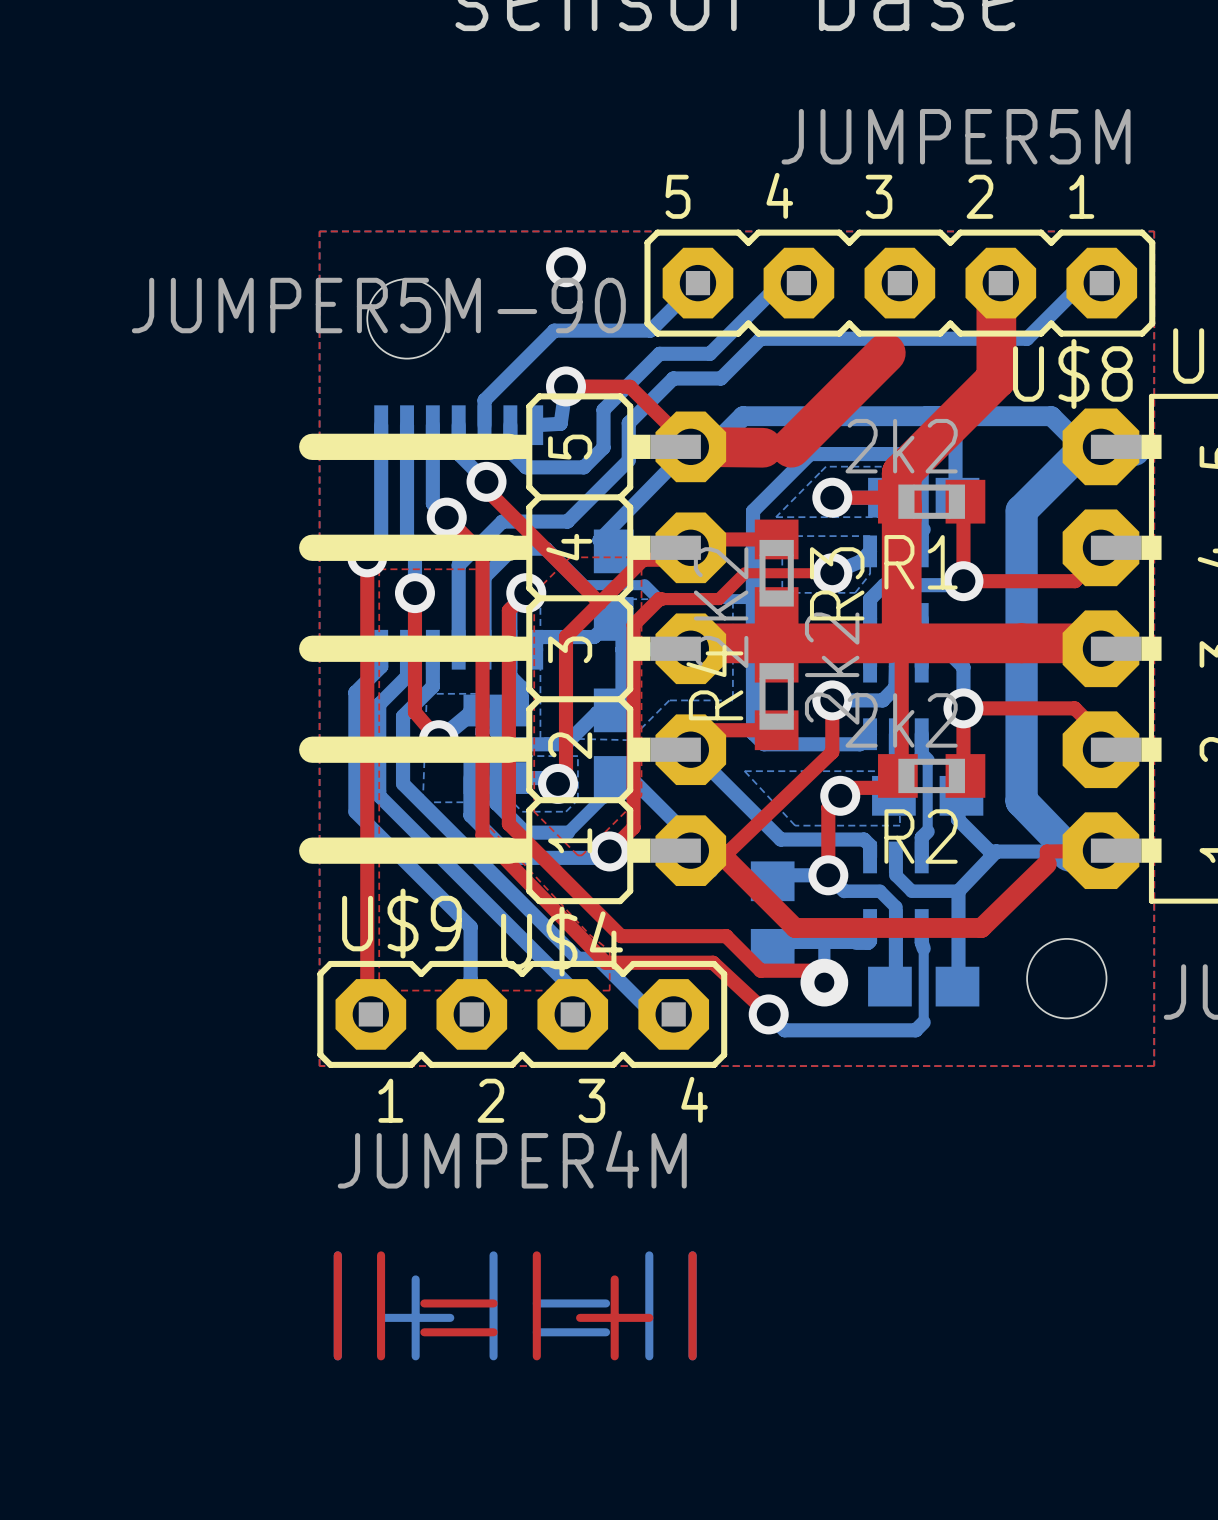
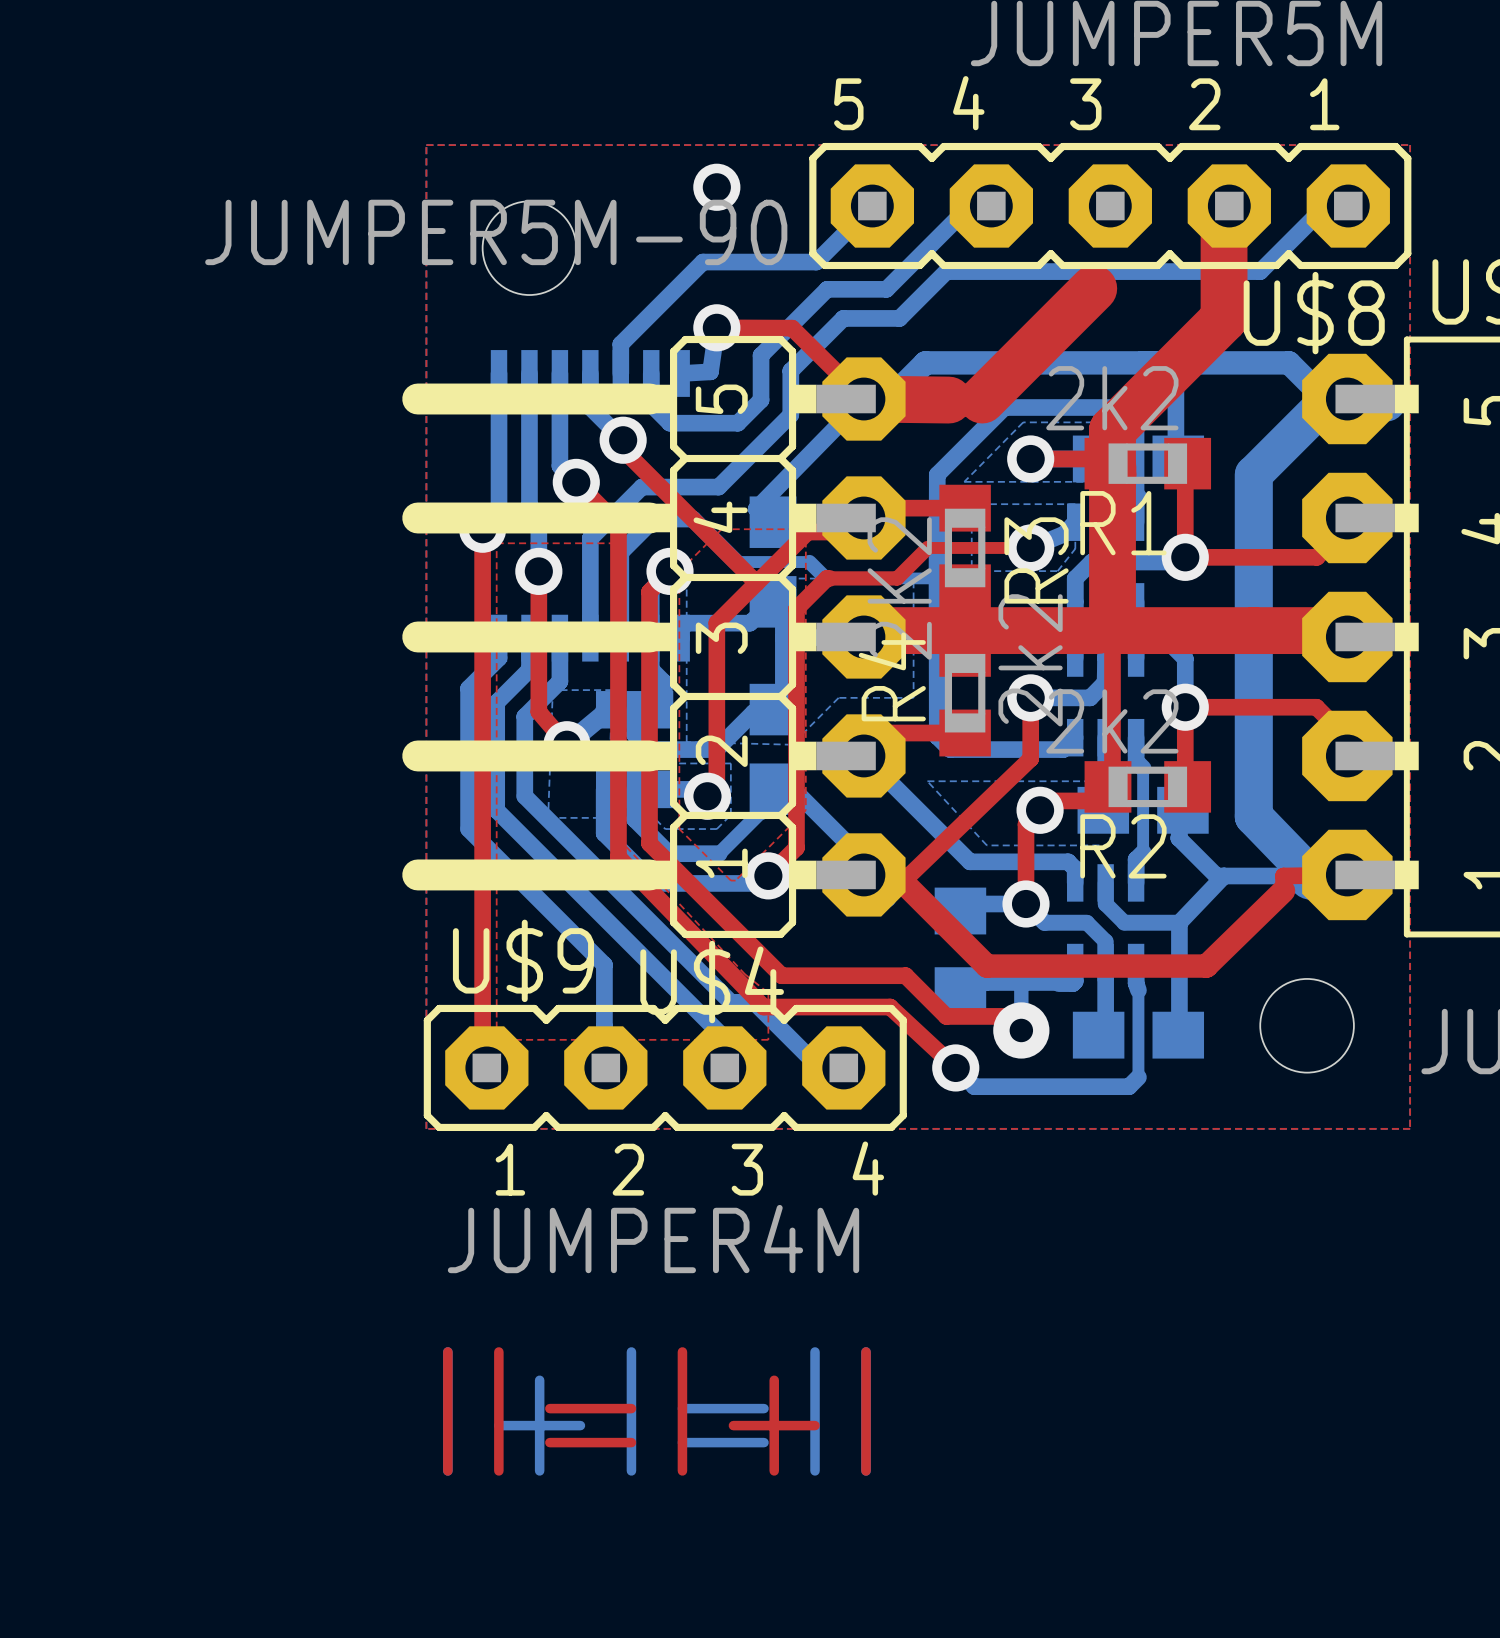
R1 name position: R1 (921, 562) -> R1 (1123, 523)
R2 name position: R2 (921, 836) -> R2 (1123, 846)

